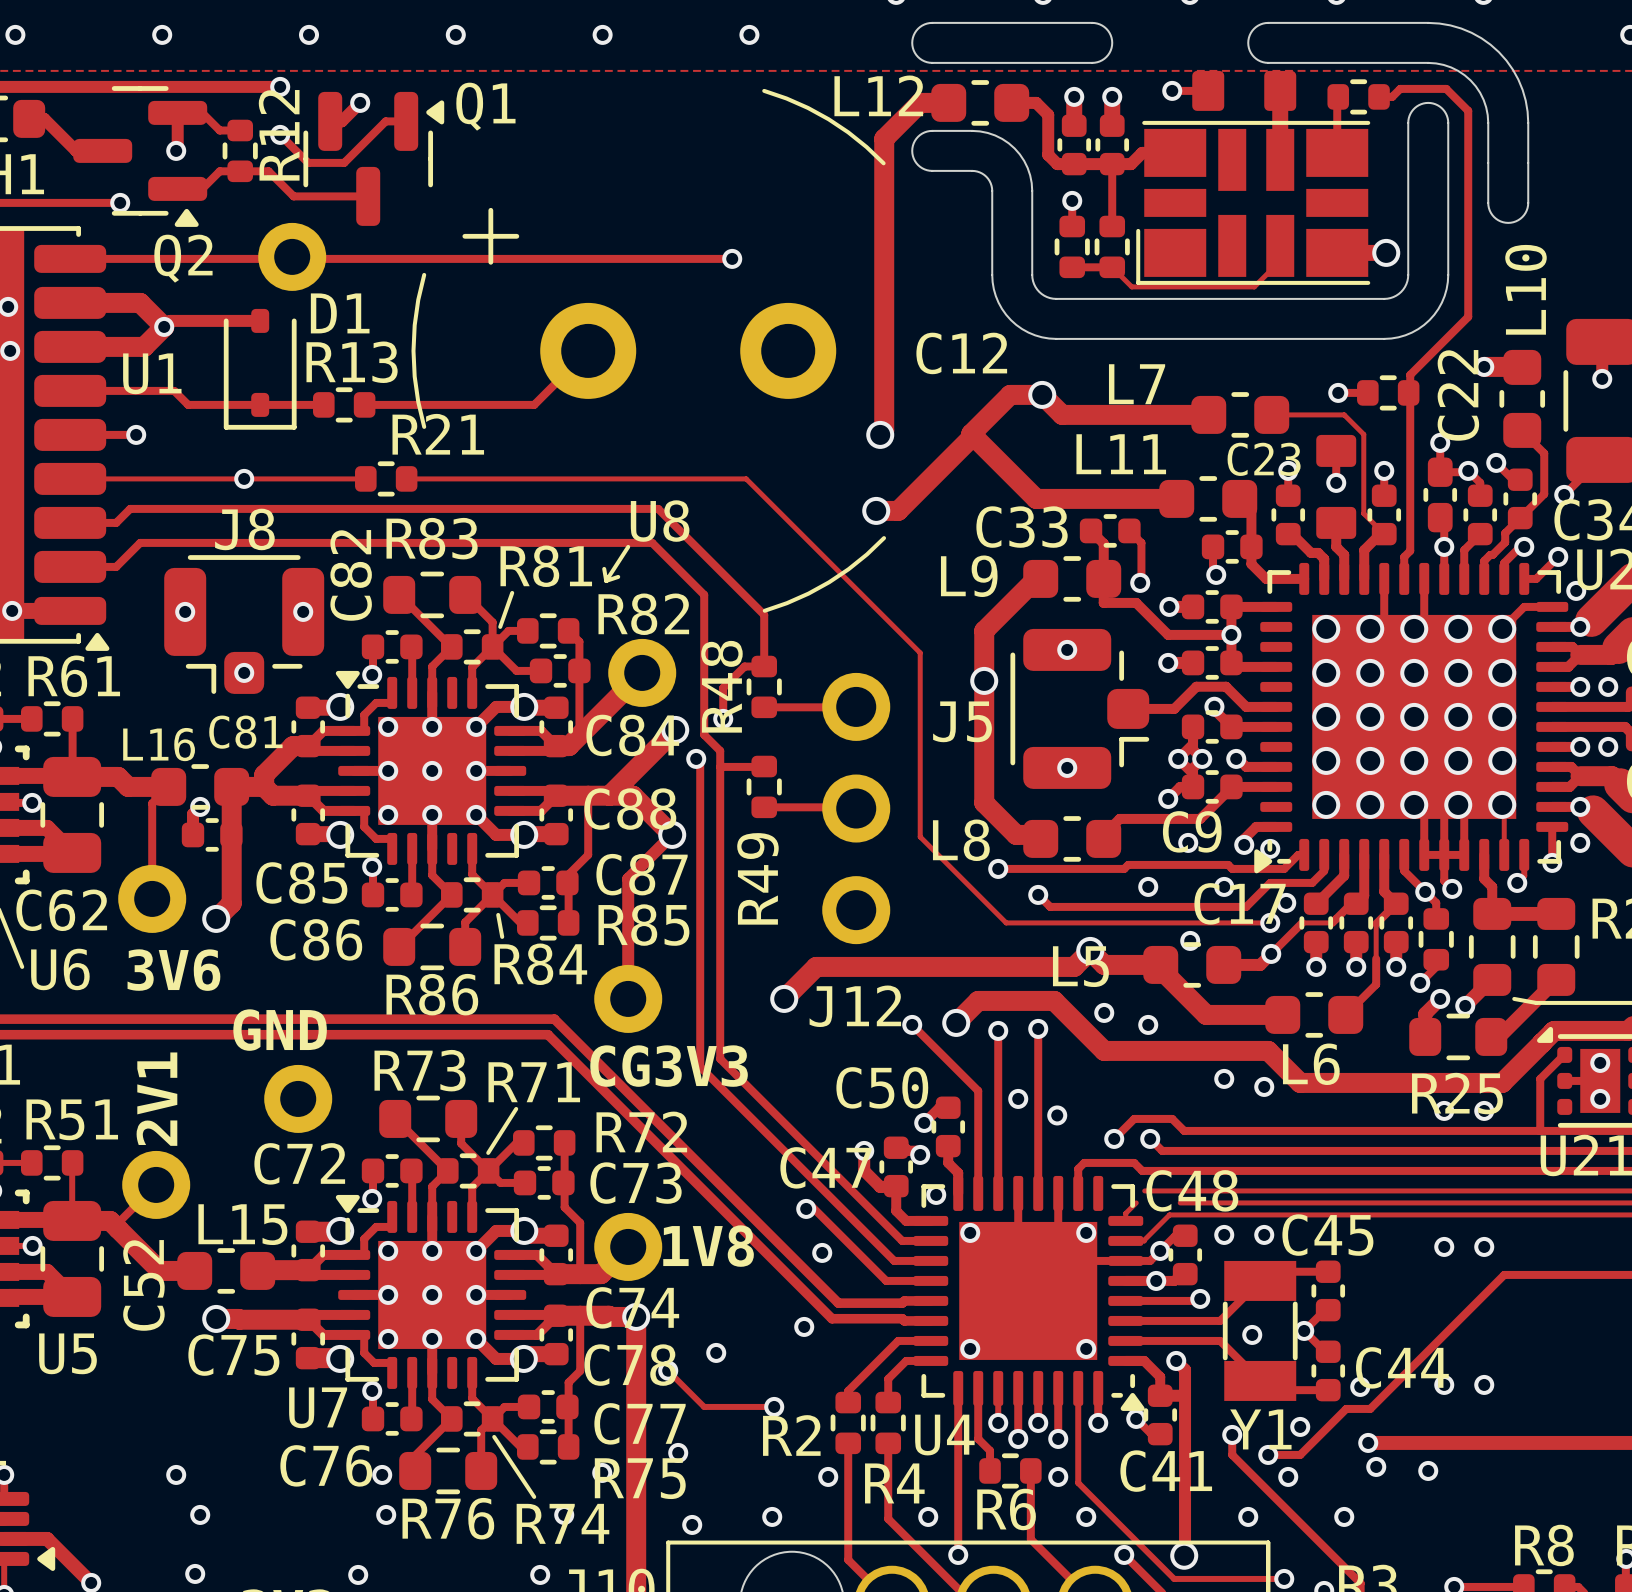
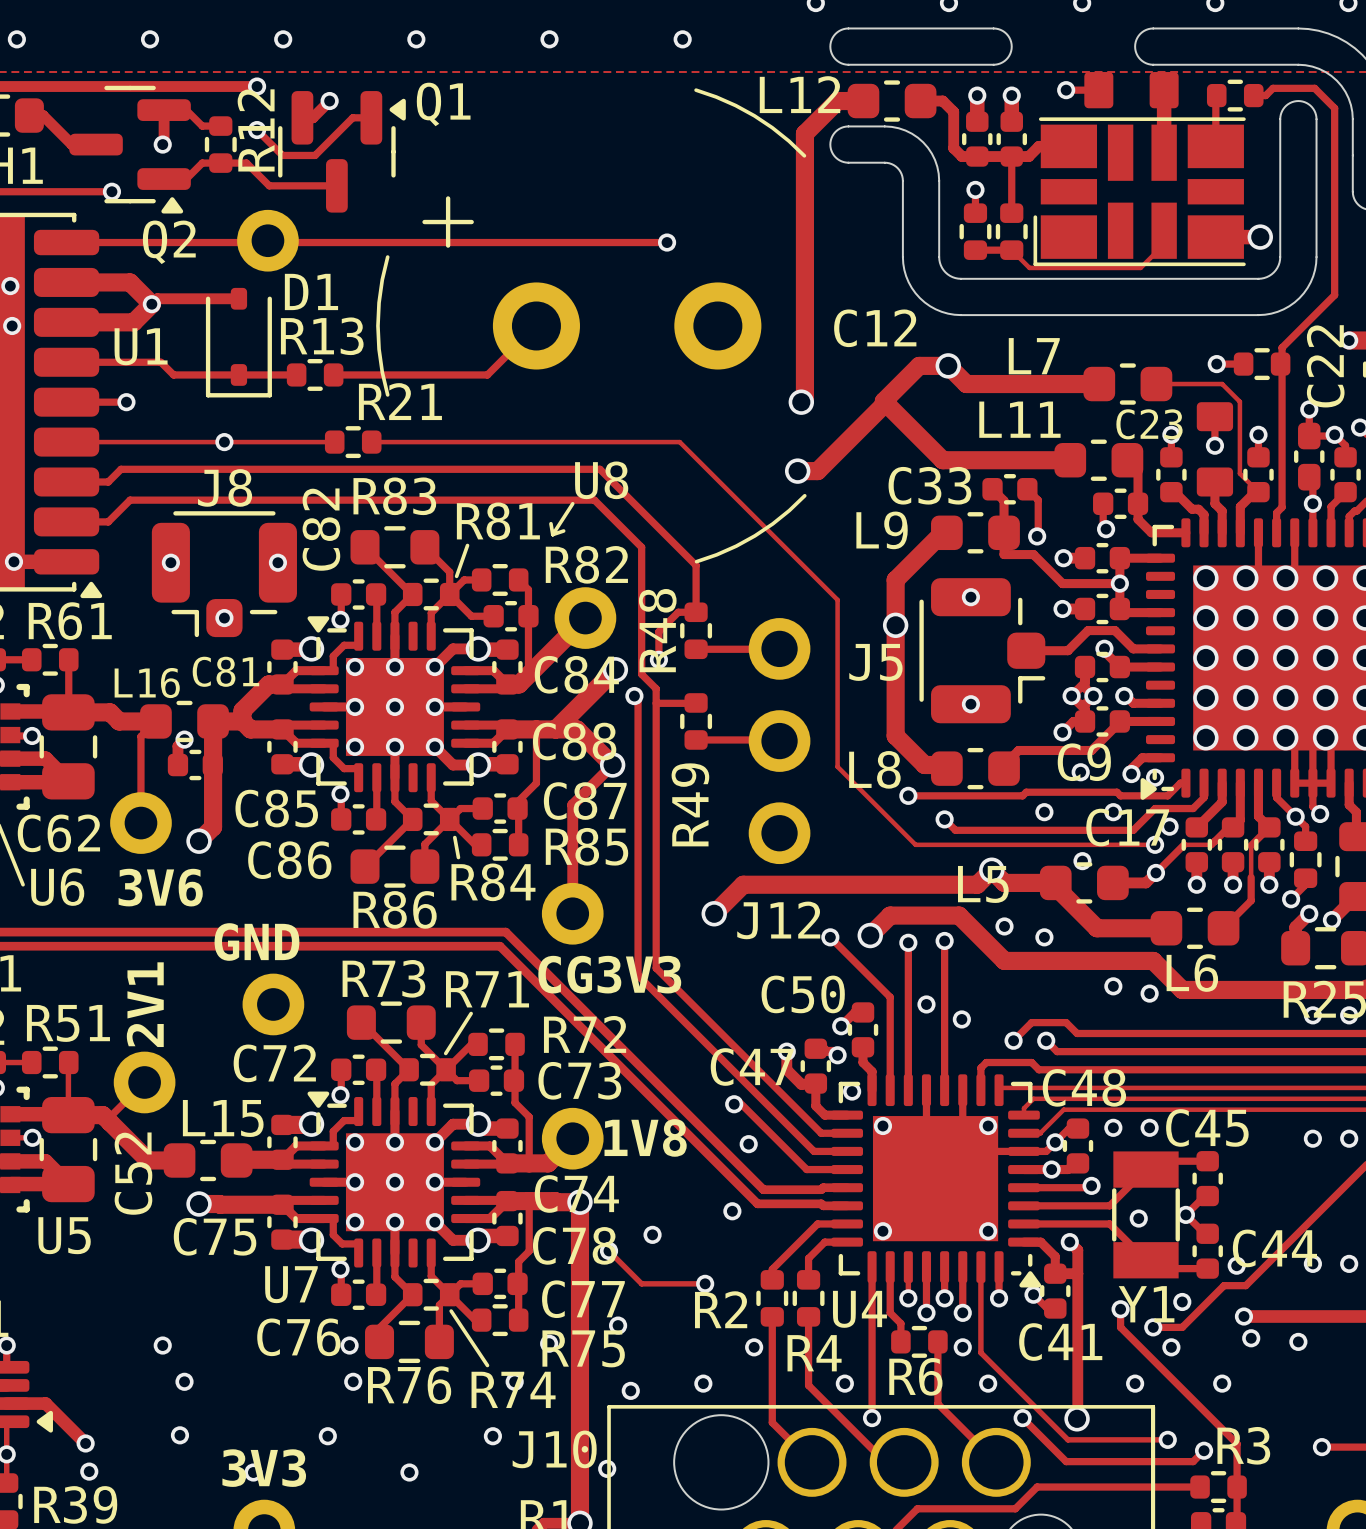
track: none -> (1001, 1087) (1041, 1087)
track: none -> (1033, 1098) (1073, 1098)

